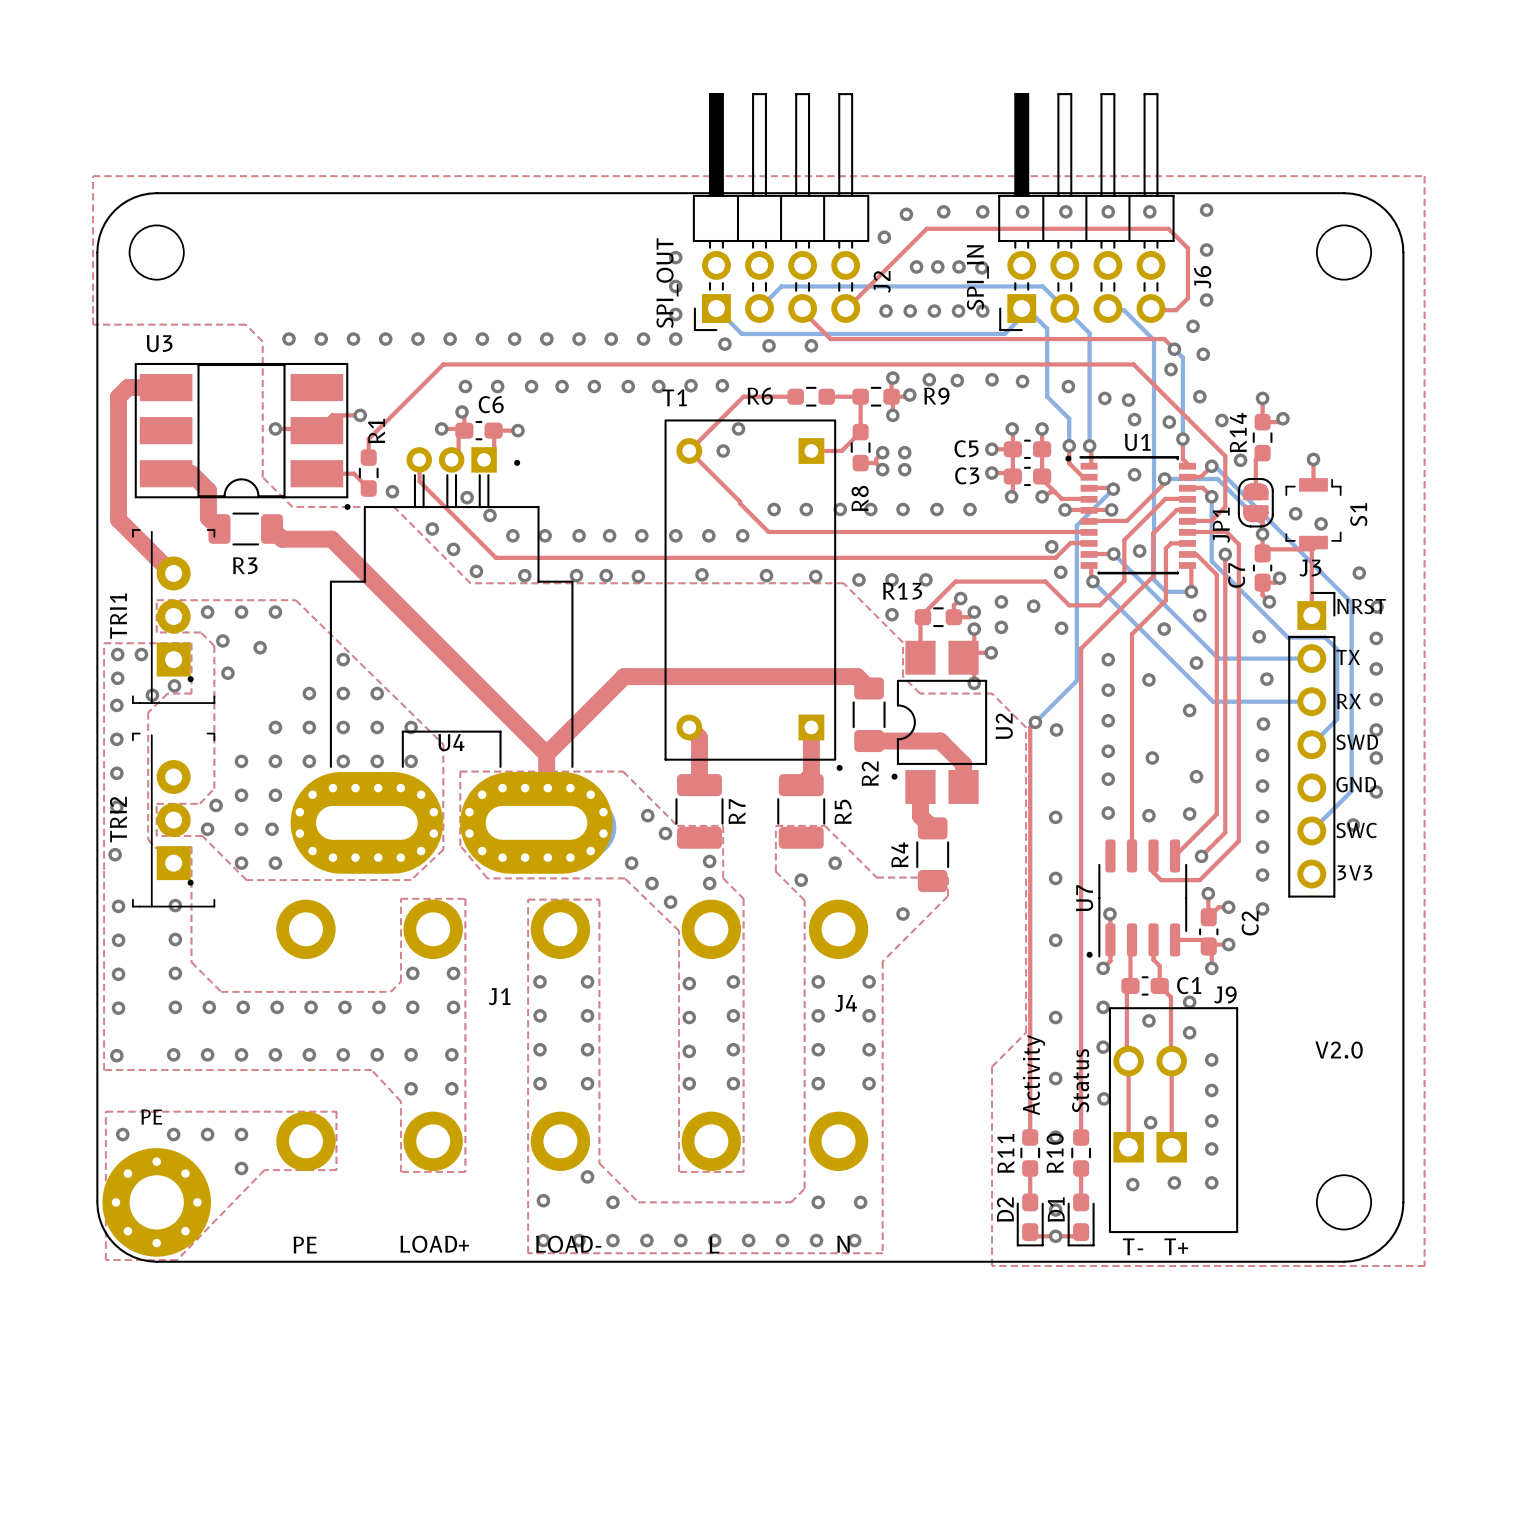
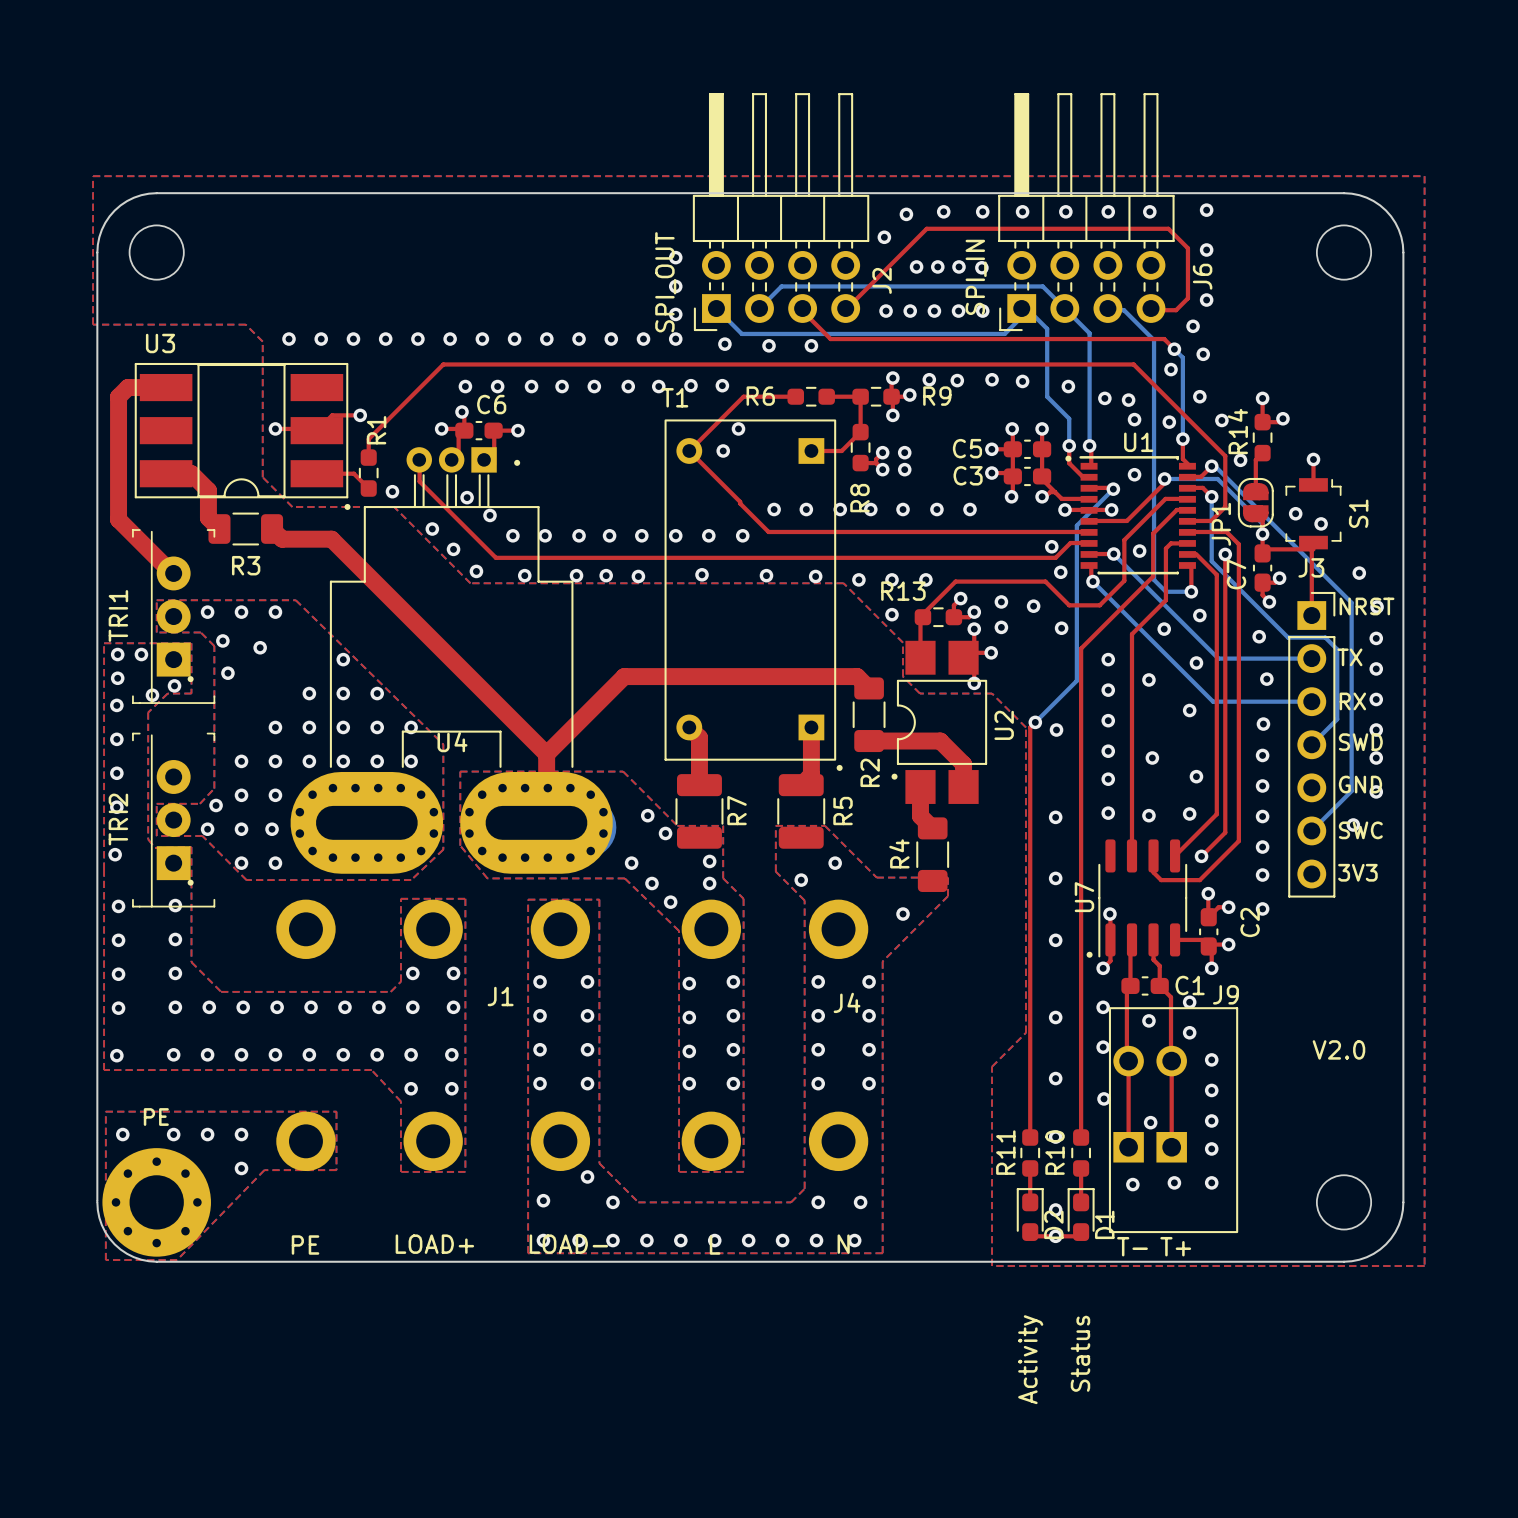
D2 rotation: 0° (1030, 1219) -> 180° (1030, 1214)
D1 rotation: 0° (1081, 1219) -> 180° (1081, 1214)

